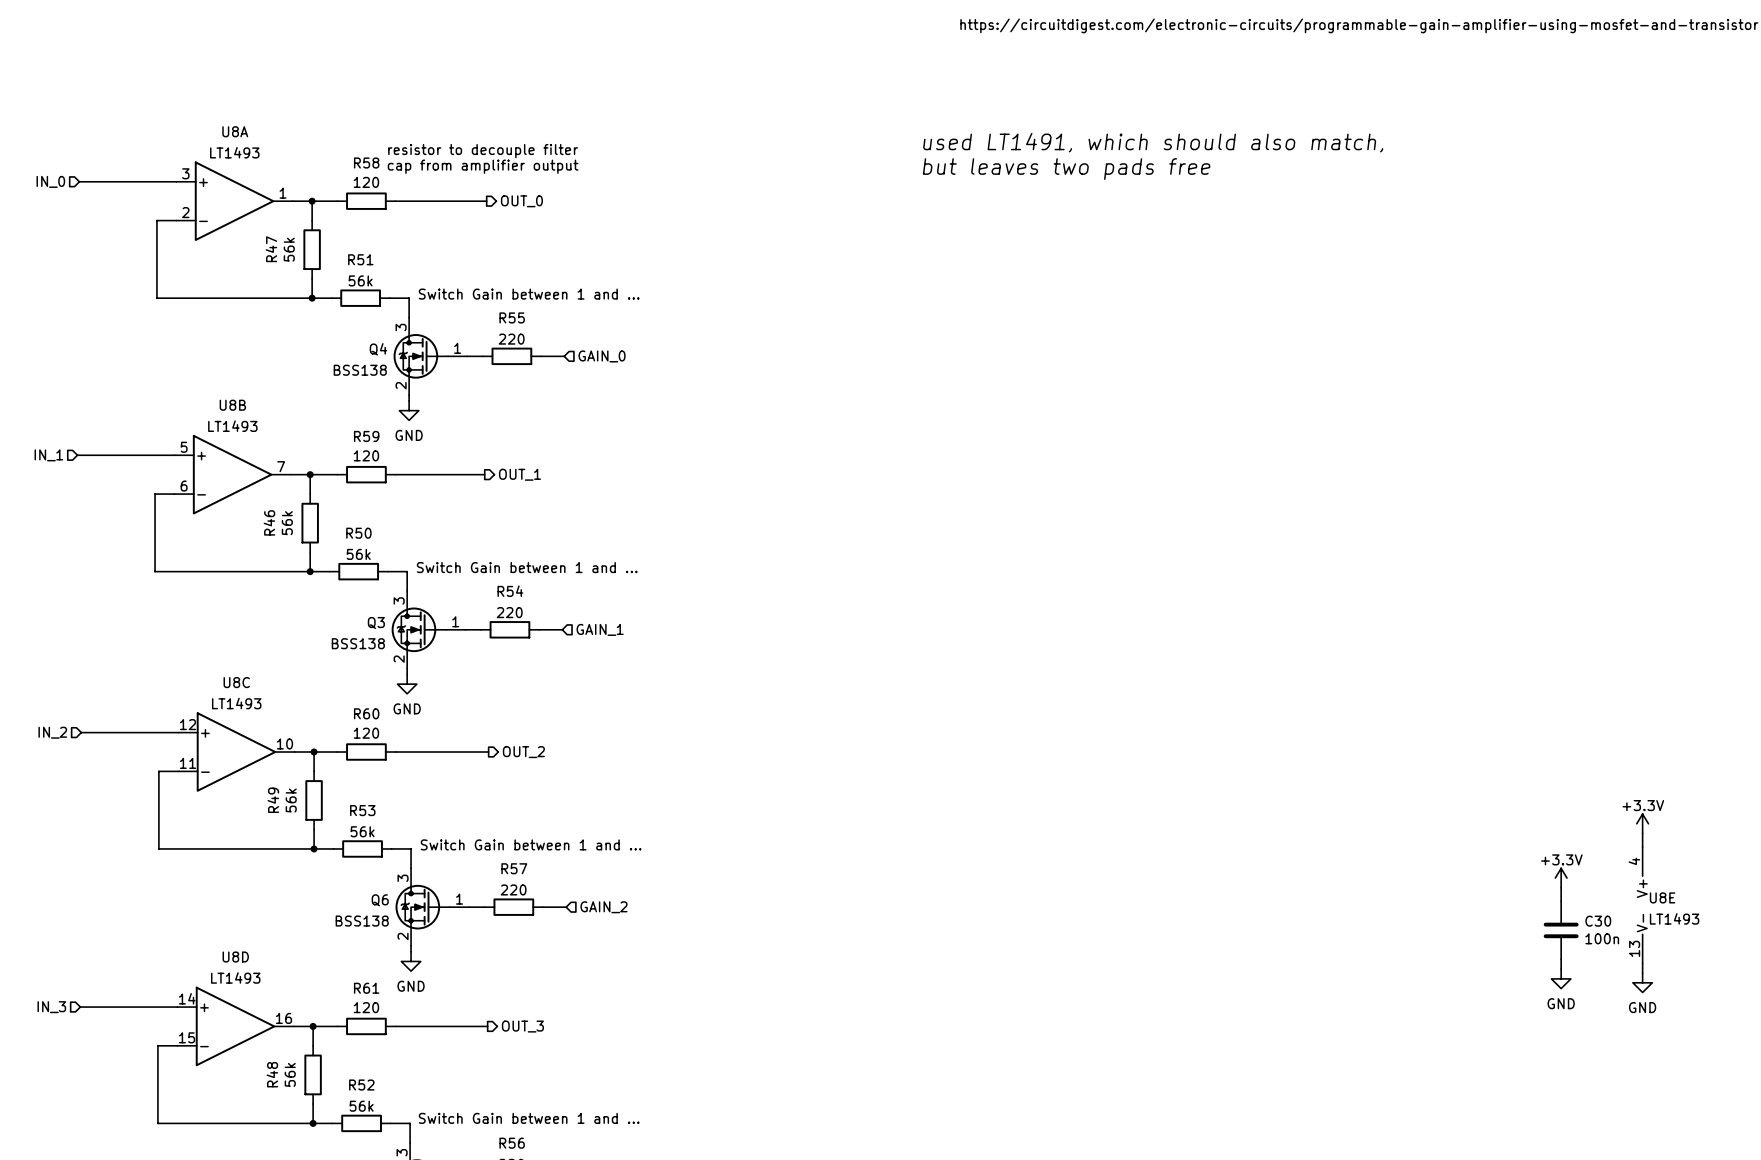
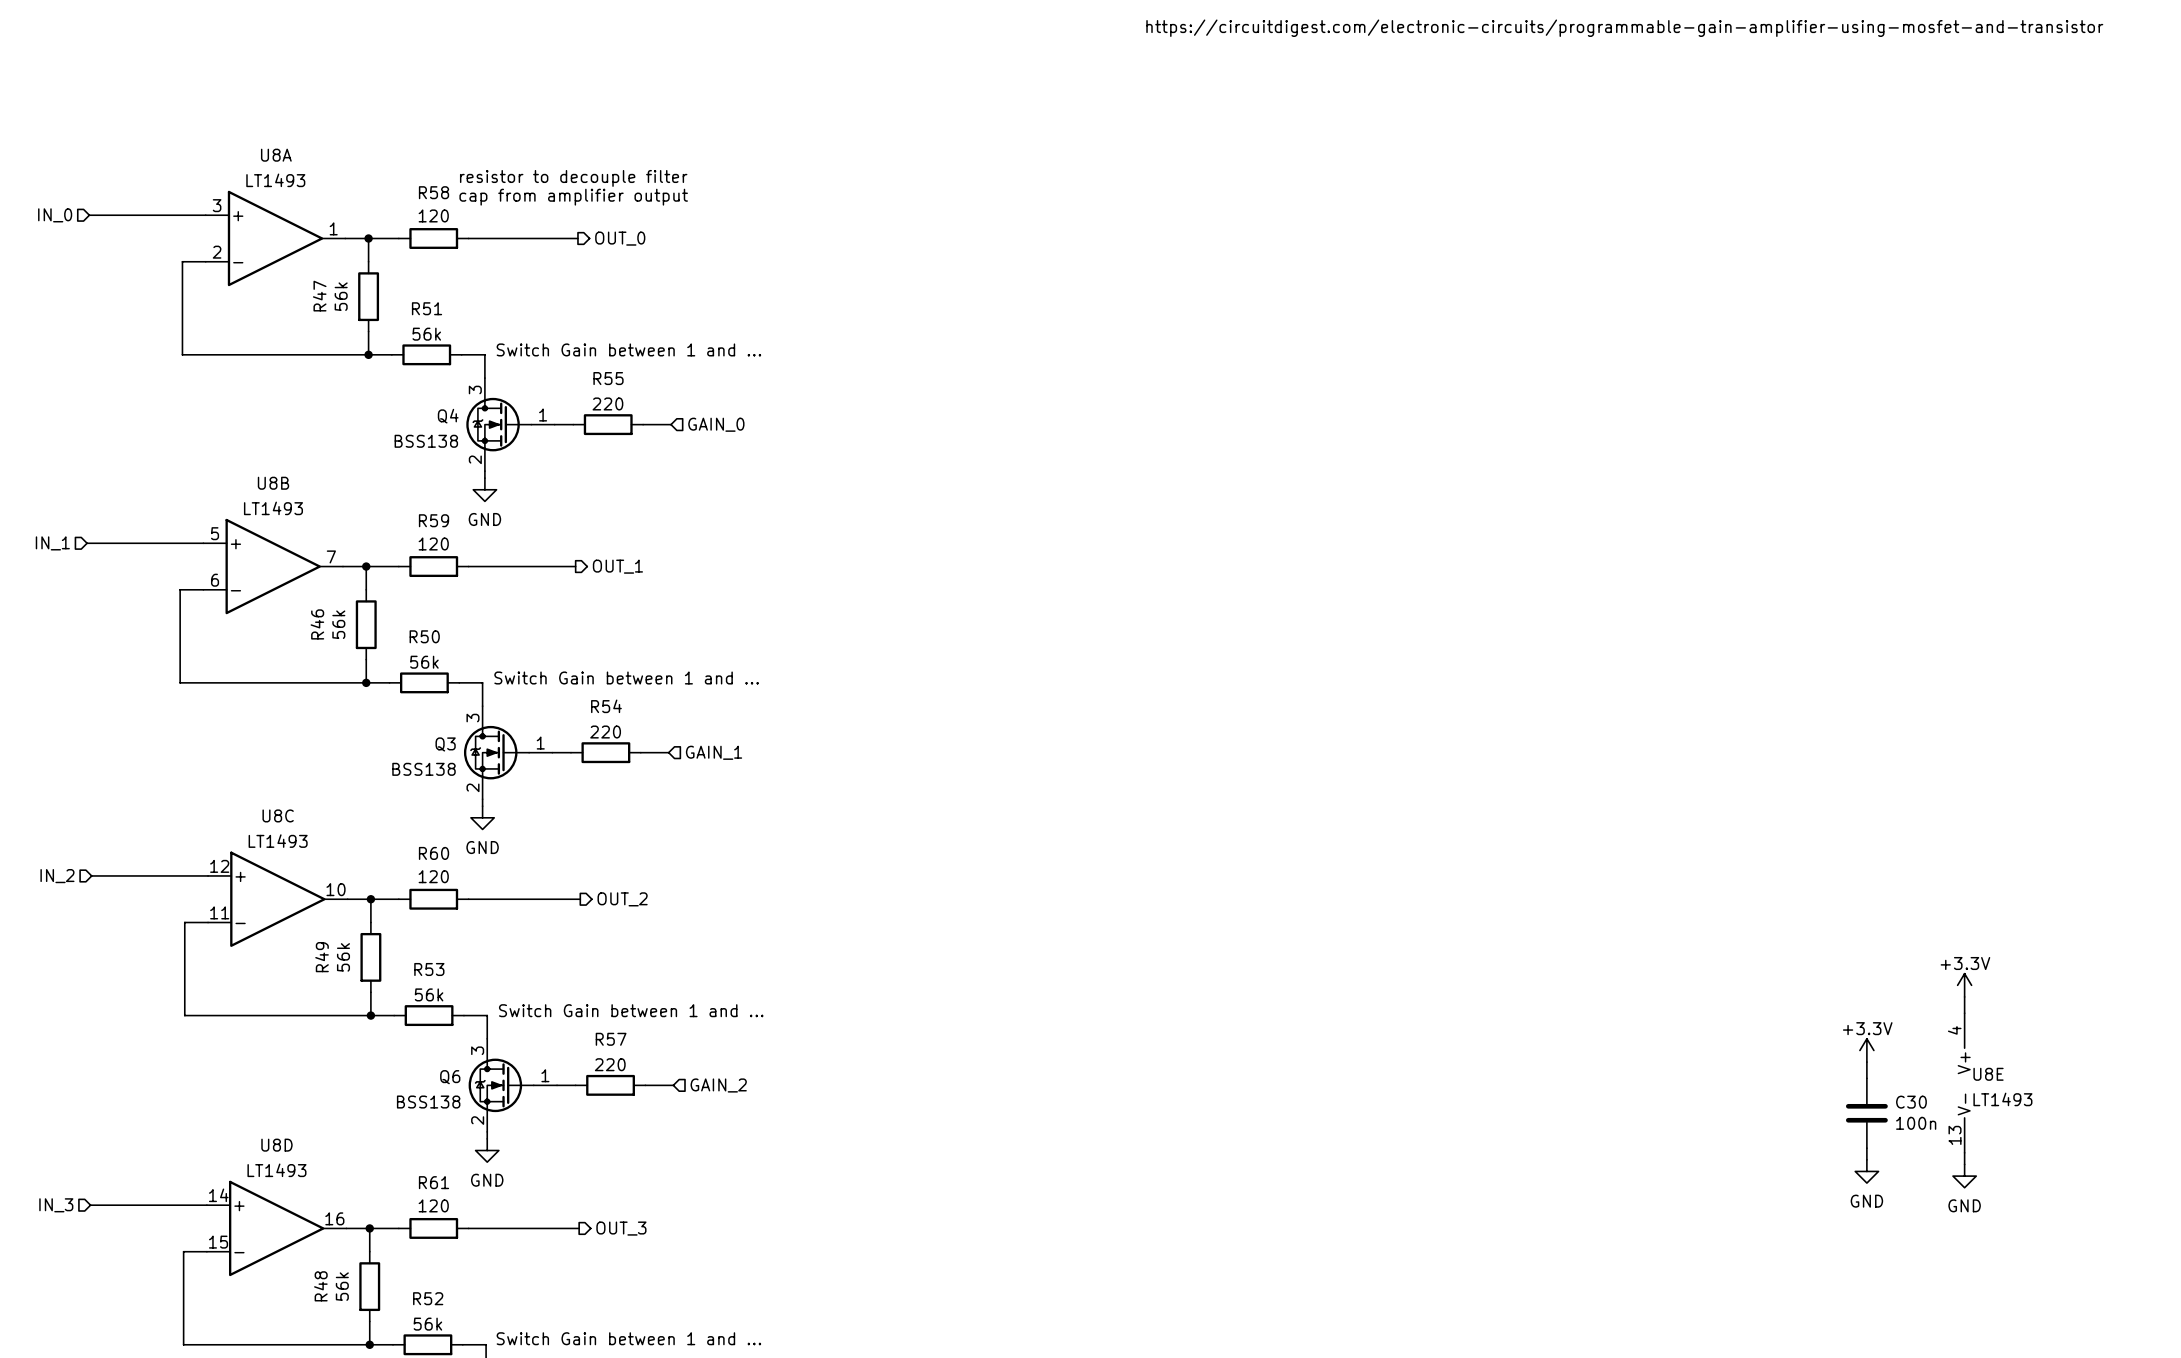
text: used LT1491, which should also match, (1153, 142) -> none
text: but leaves two pads free (1066, 169) -> none

